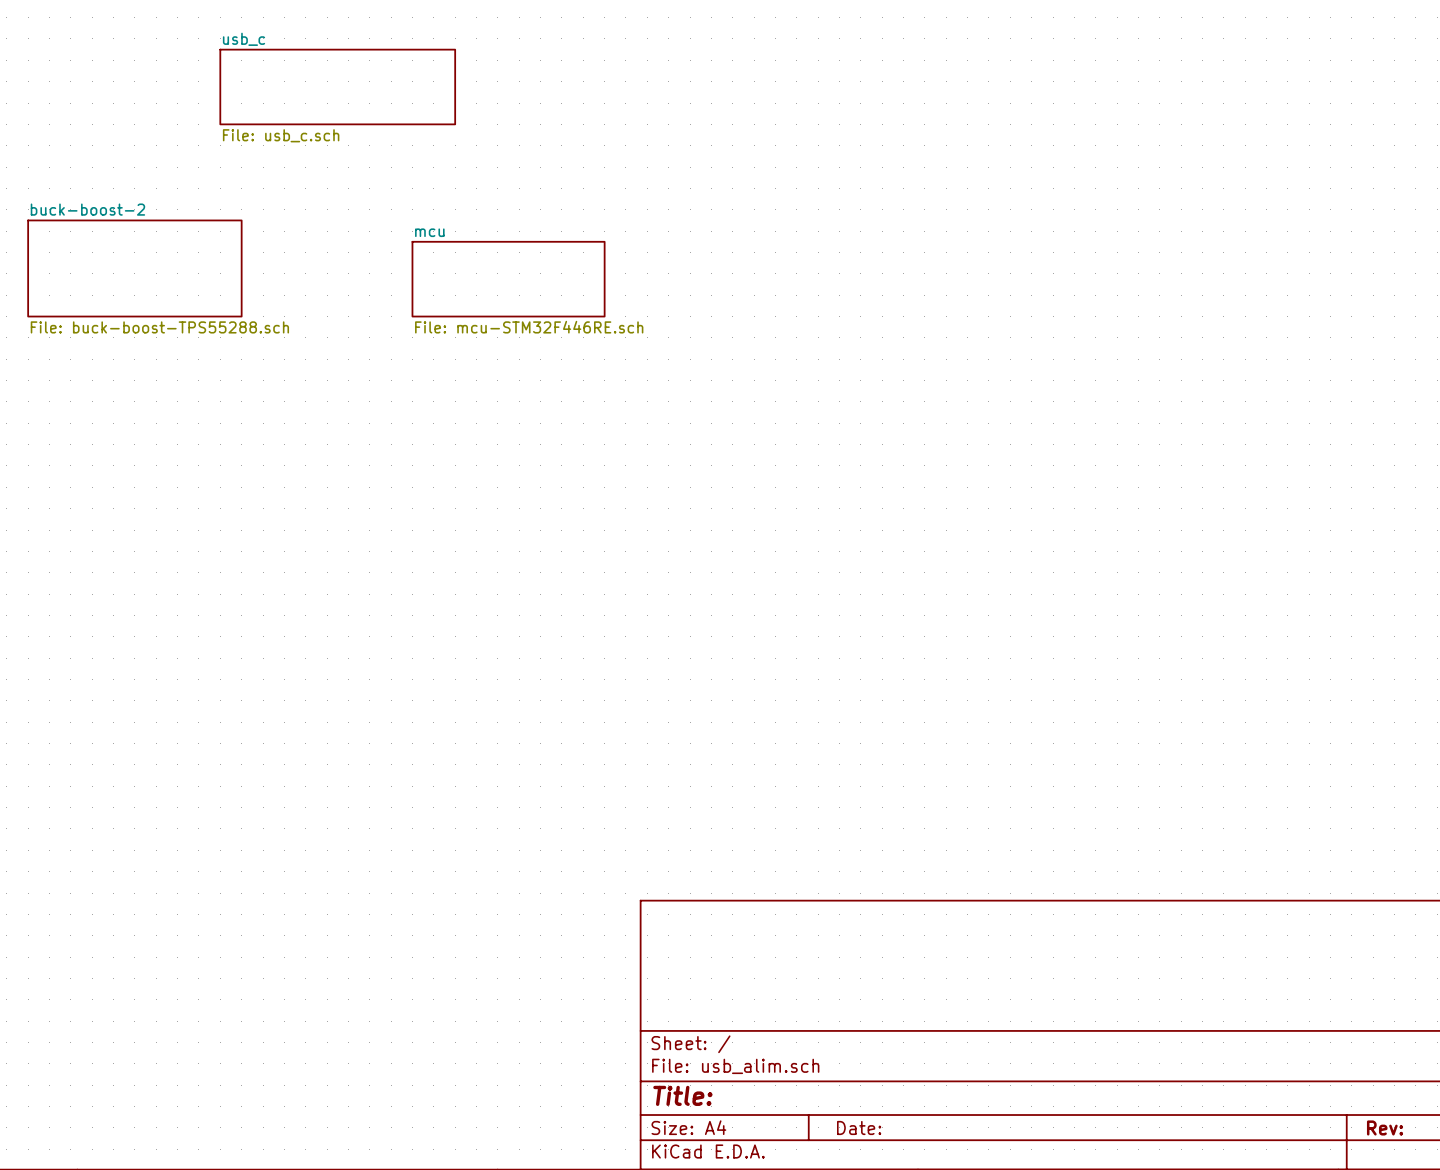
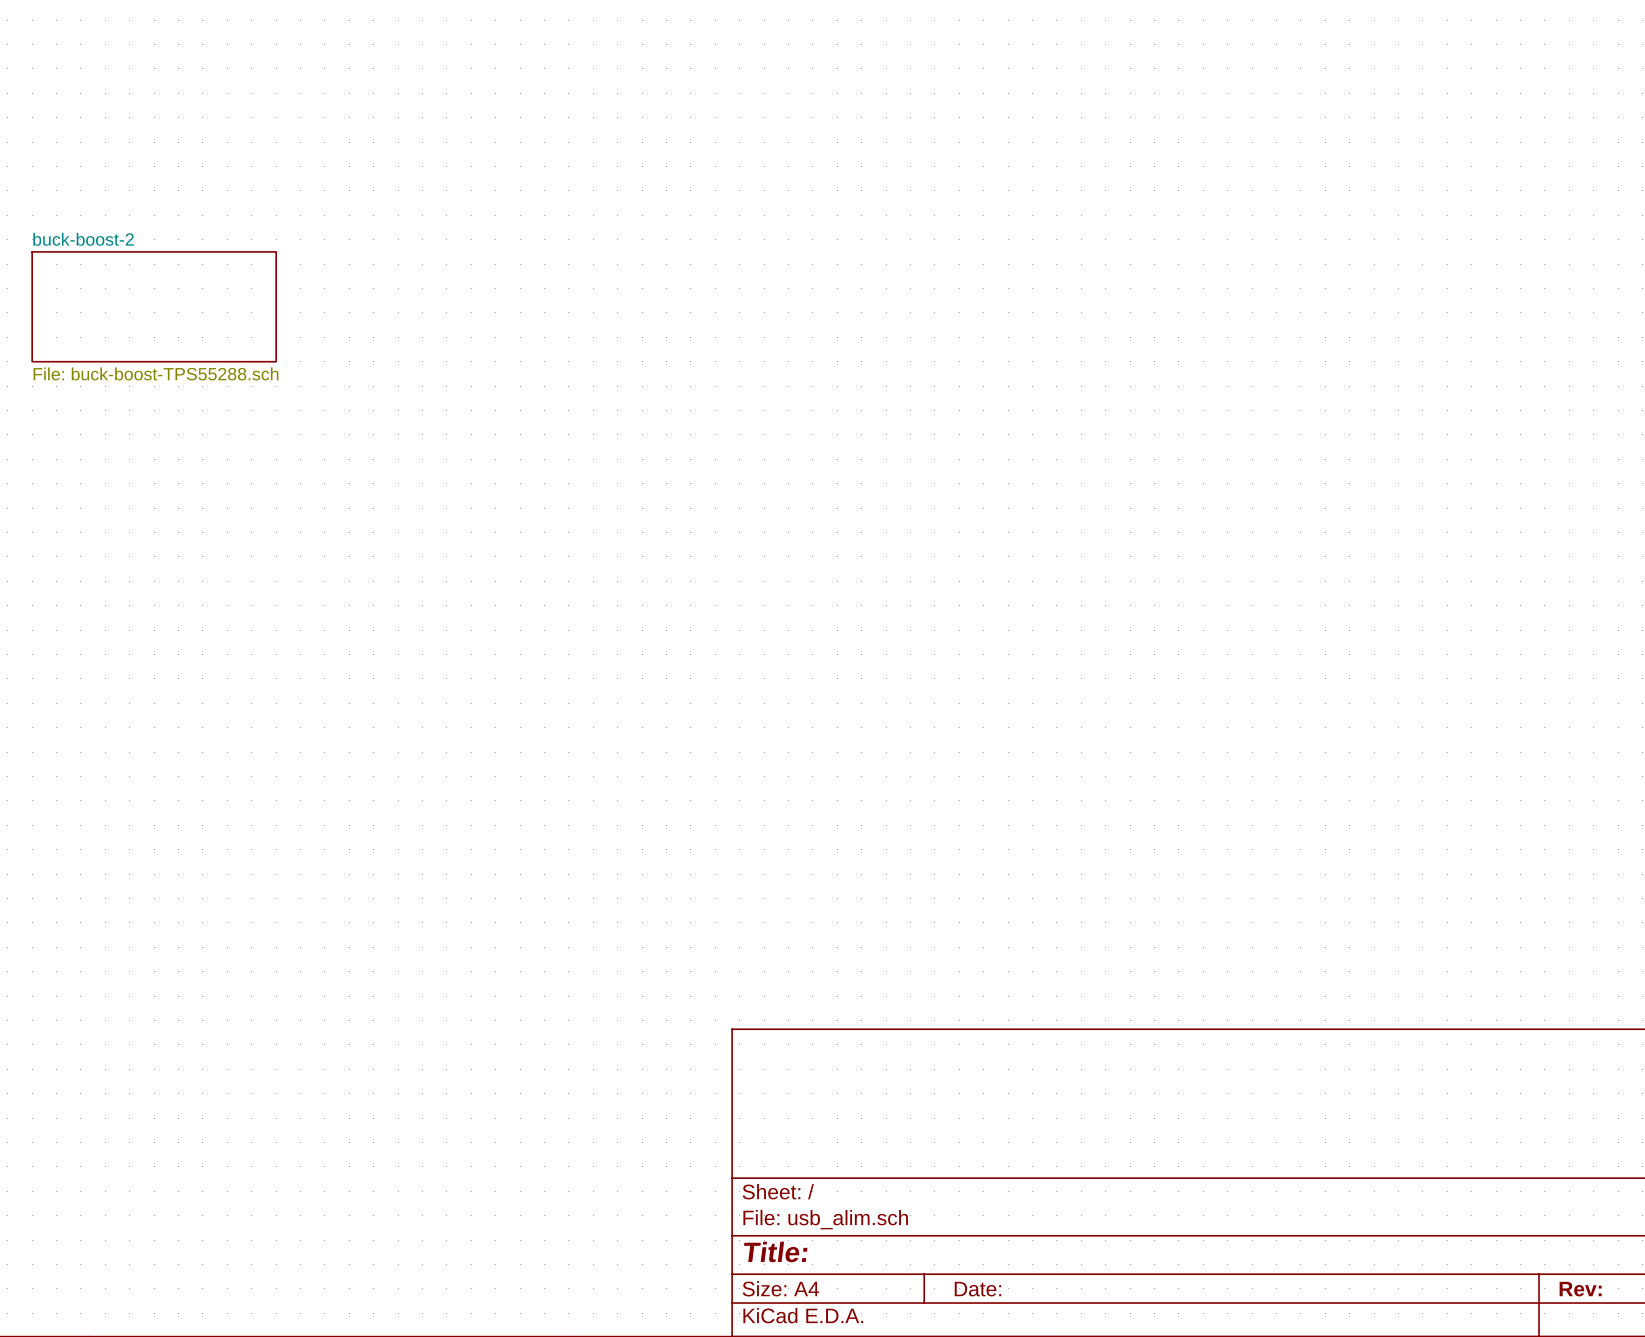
sheet usb_c: File: usb_c.sch (337, 87) -> none
sheet mcu: File: mcu-STM32F446RE.sch (508, 279) -> none

